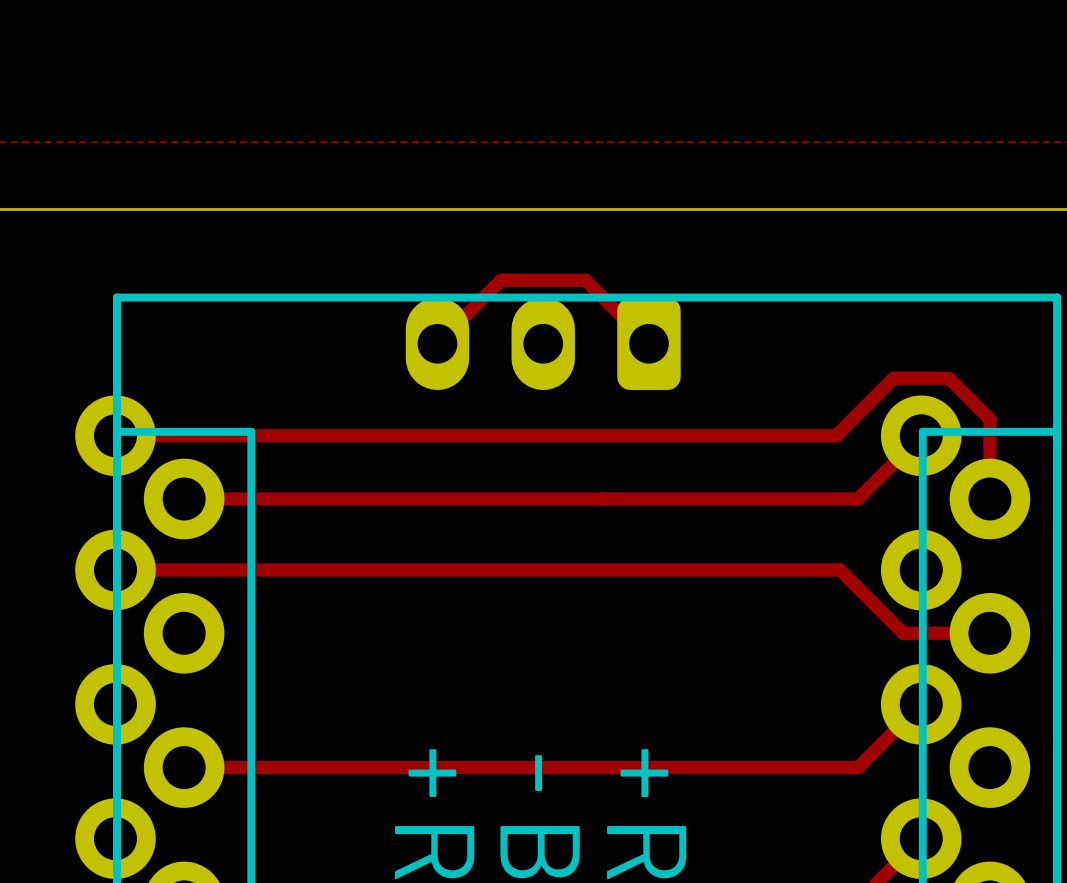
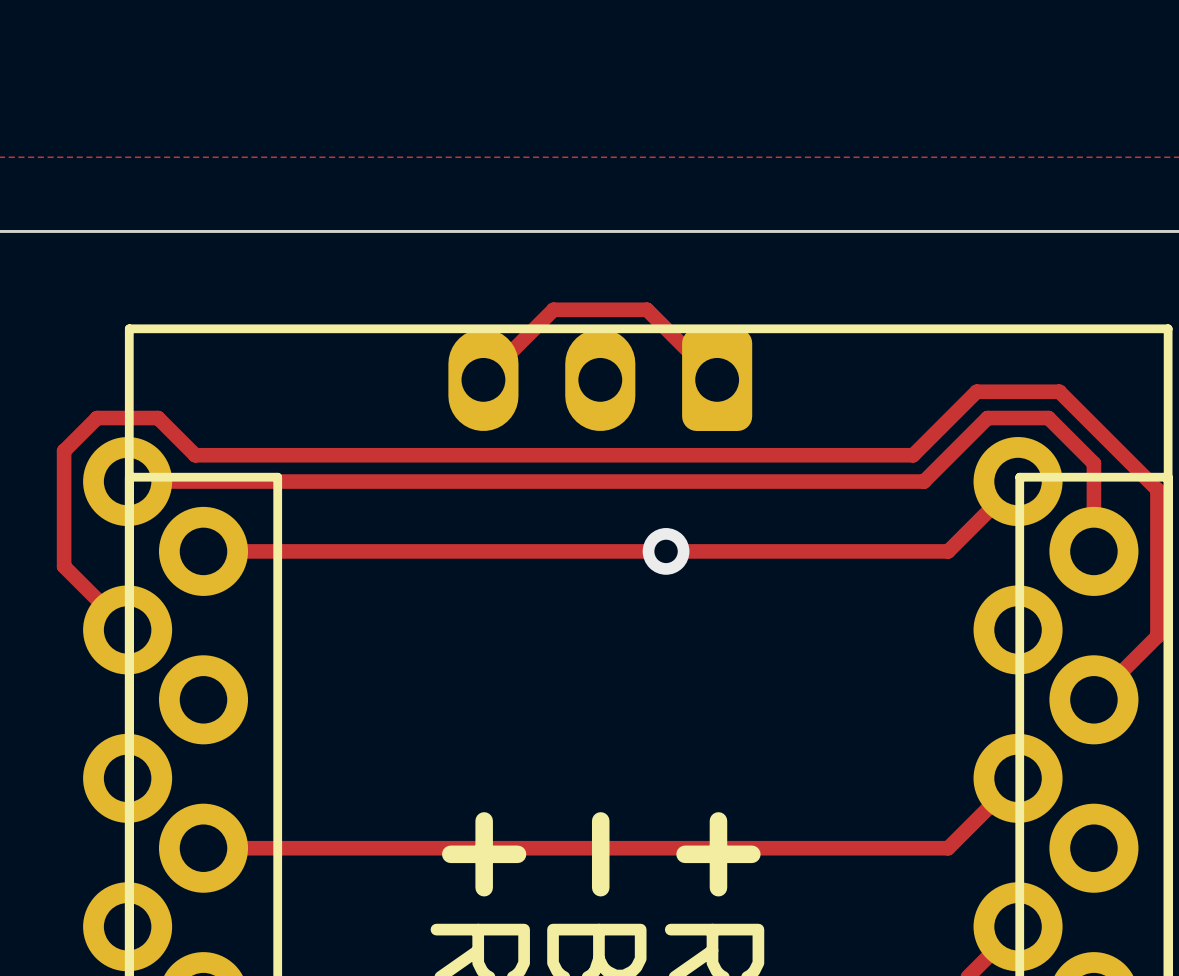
via: none -> (666, 551)
track: (115, 570) (840, 570) (903, 633) (989, 633) -> (127, 629) (64, 566) (64, 451) (97, 418) (158, 418) (195, 455) (913, 455) (976, 391) (1059, 391) (1157, 489) (1157, 636) (1093, 699)

